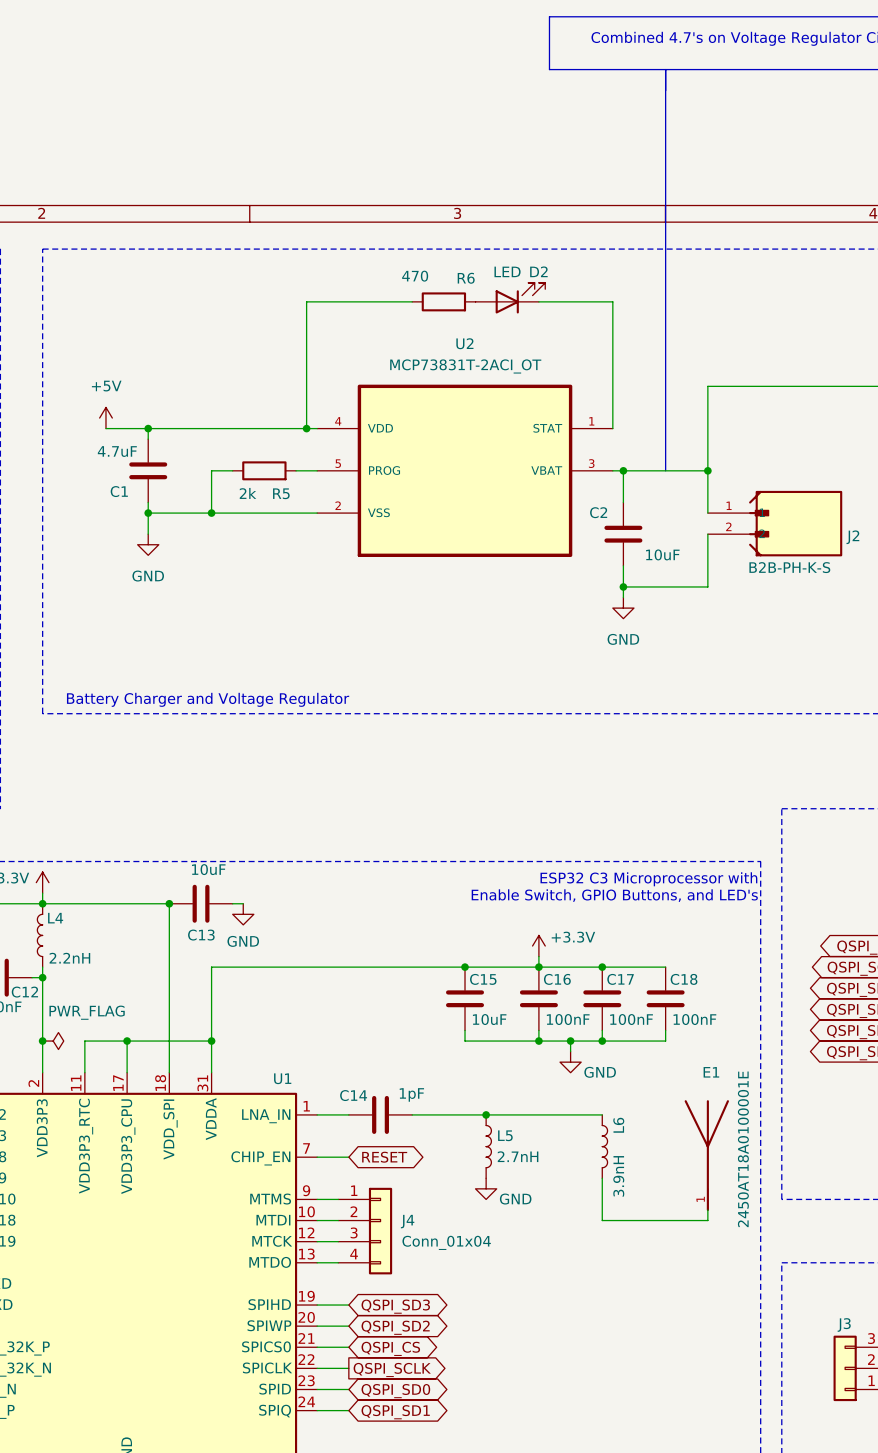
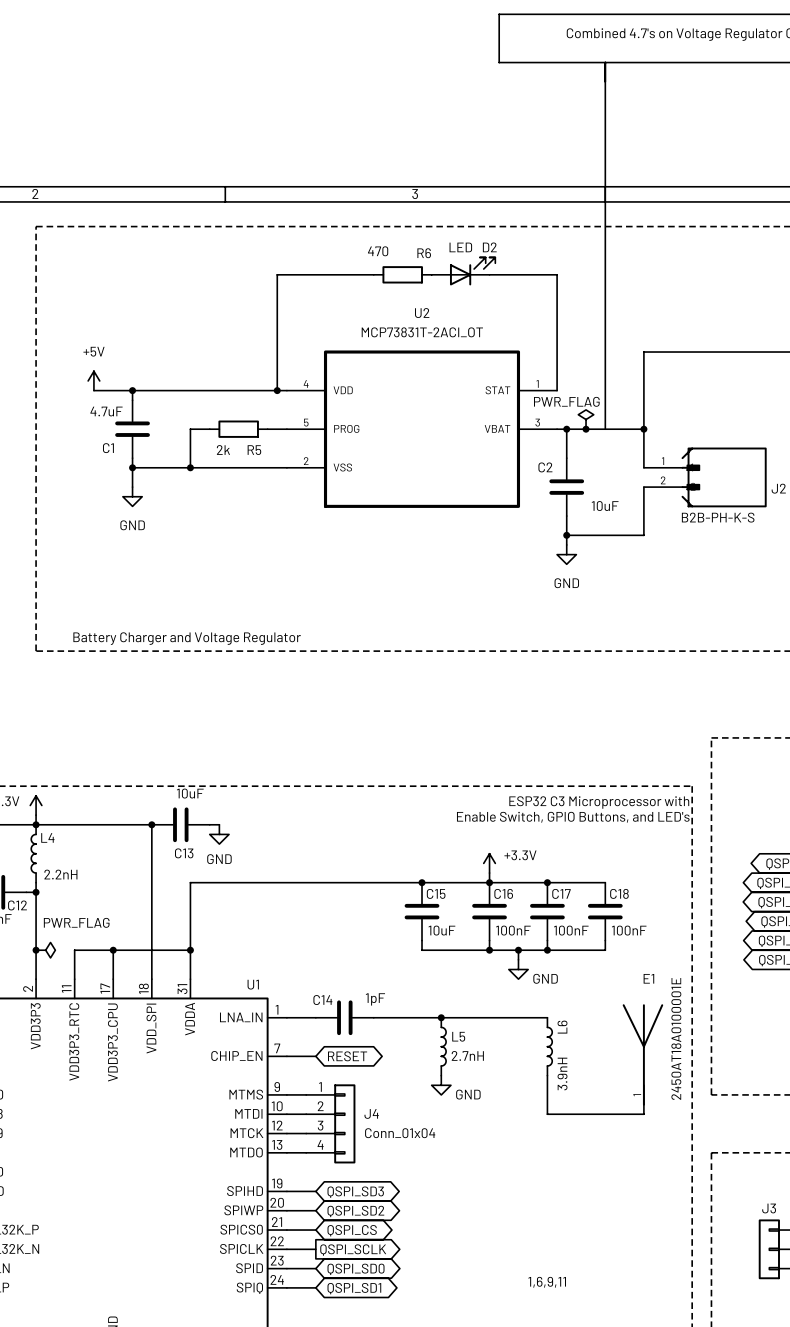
power symbol: none -> PWR_FLAG (586, 419)
junction: none -> (586, 429)
text: none -> 1,6,9,11 (547, 1282)

